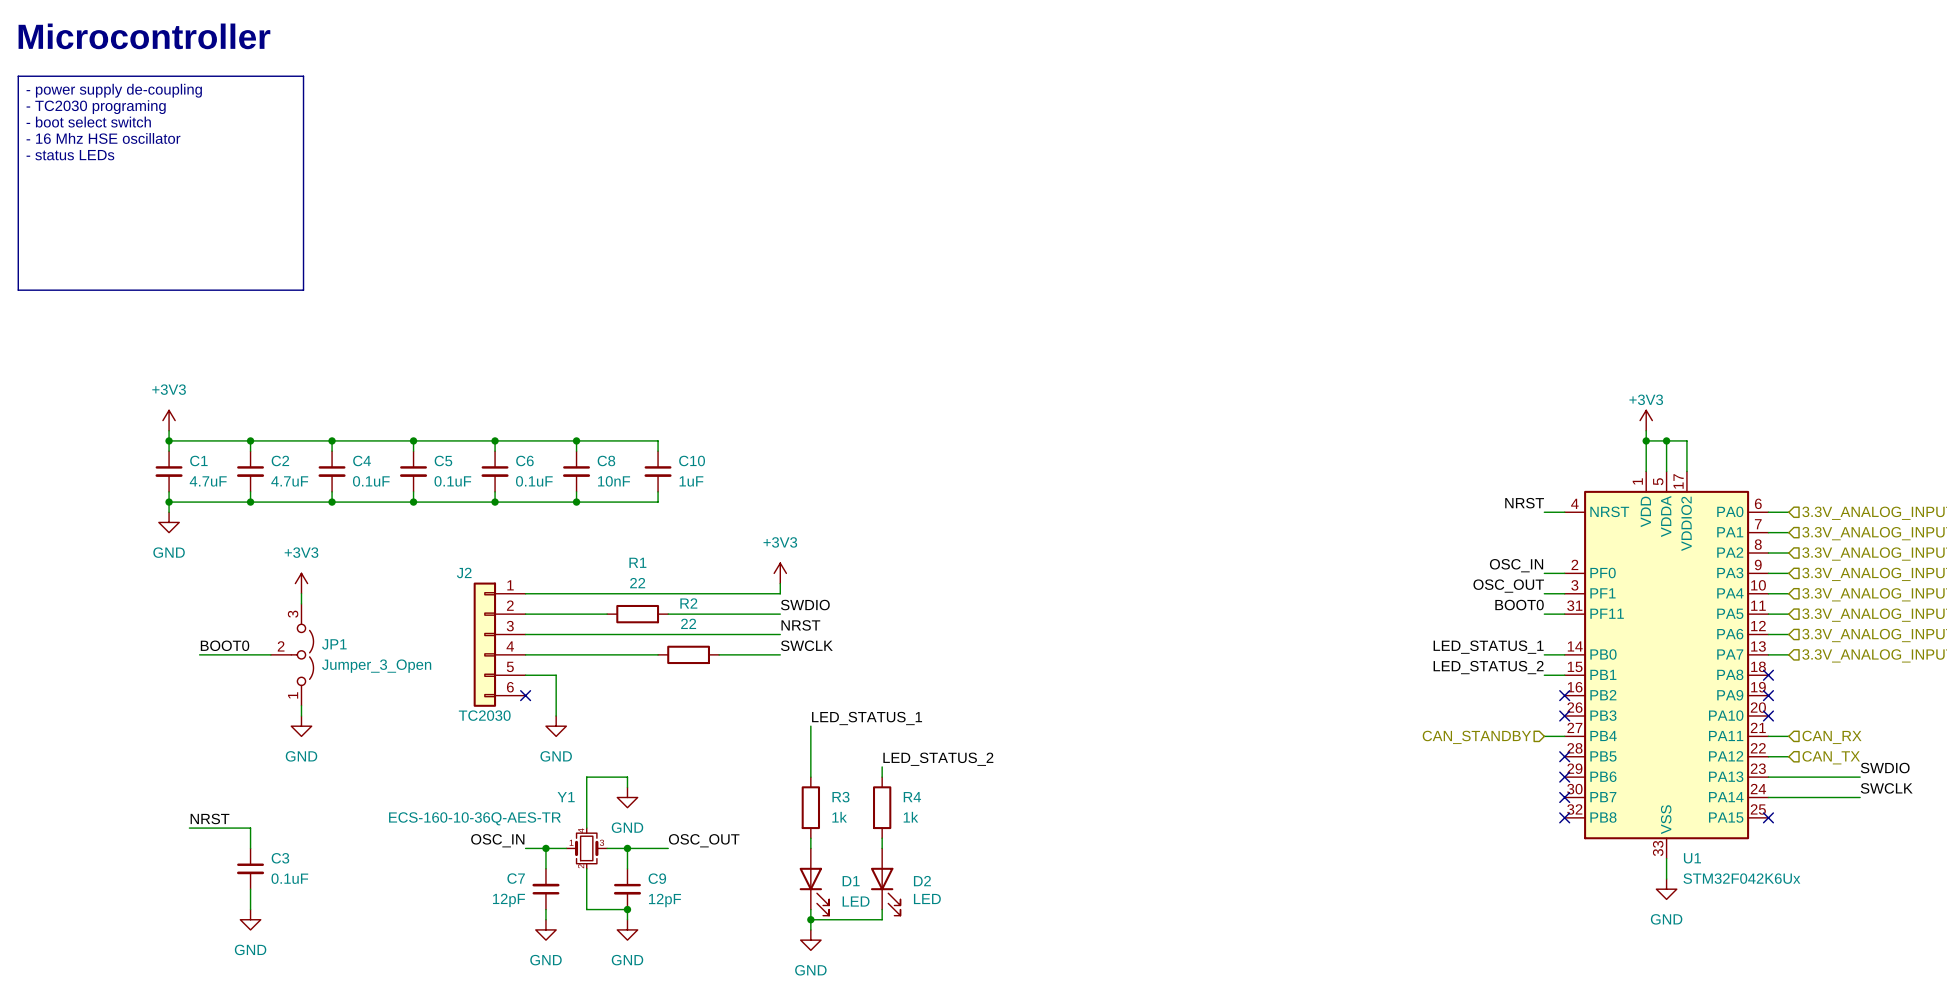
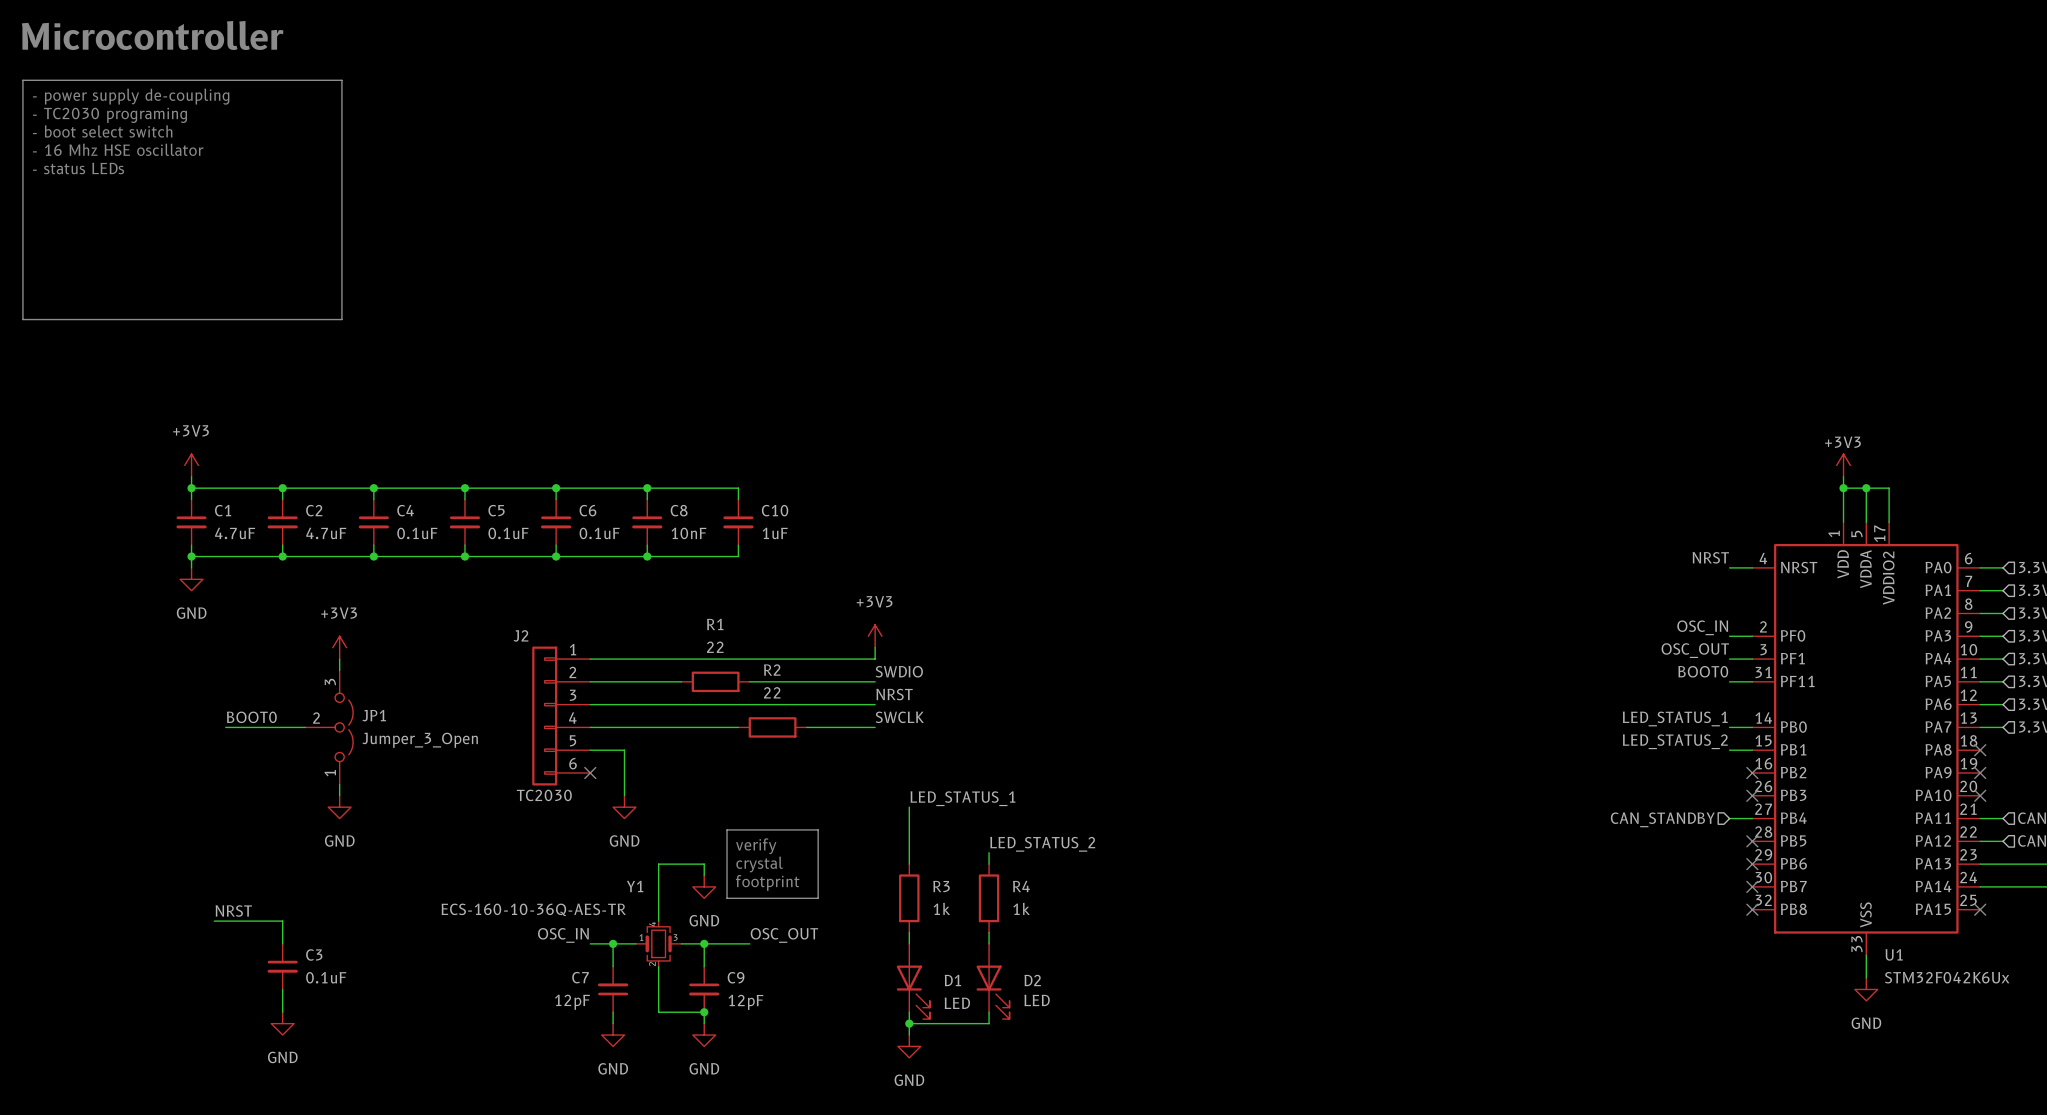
line: none -> (727, 829) (818, 829) (818, 898) (727, 898) (727, 829)
text: none -> verify (756, 846)
text: none -> crystal (759, 864)
text: none -> footprint (767, 882)

